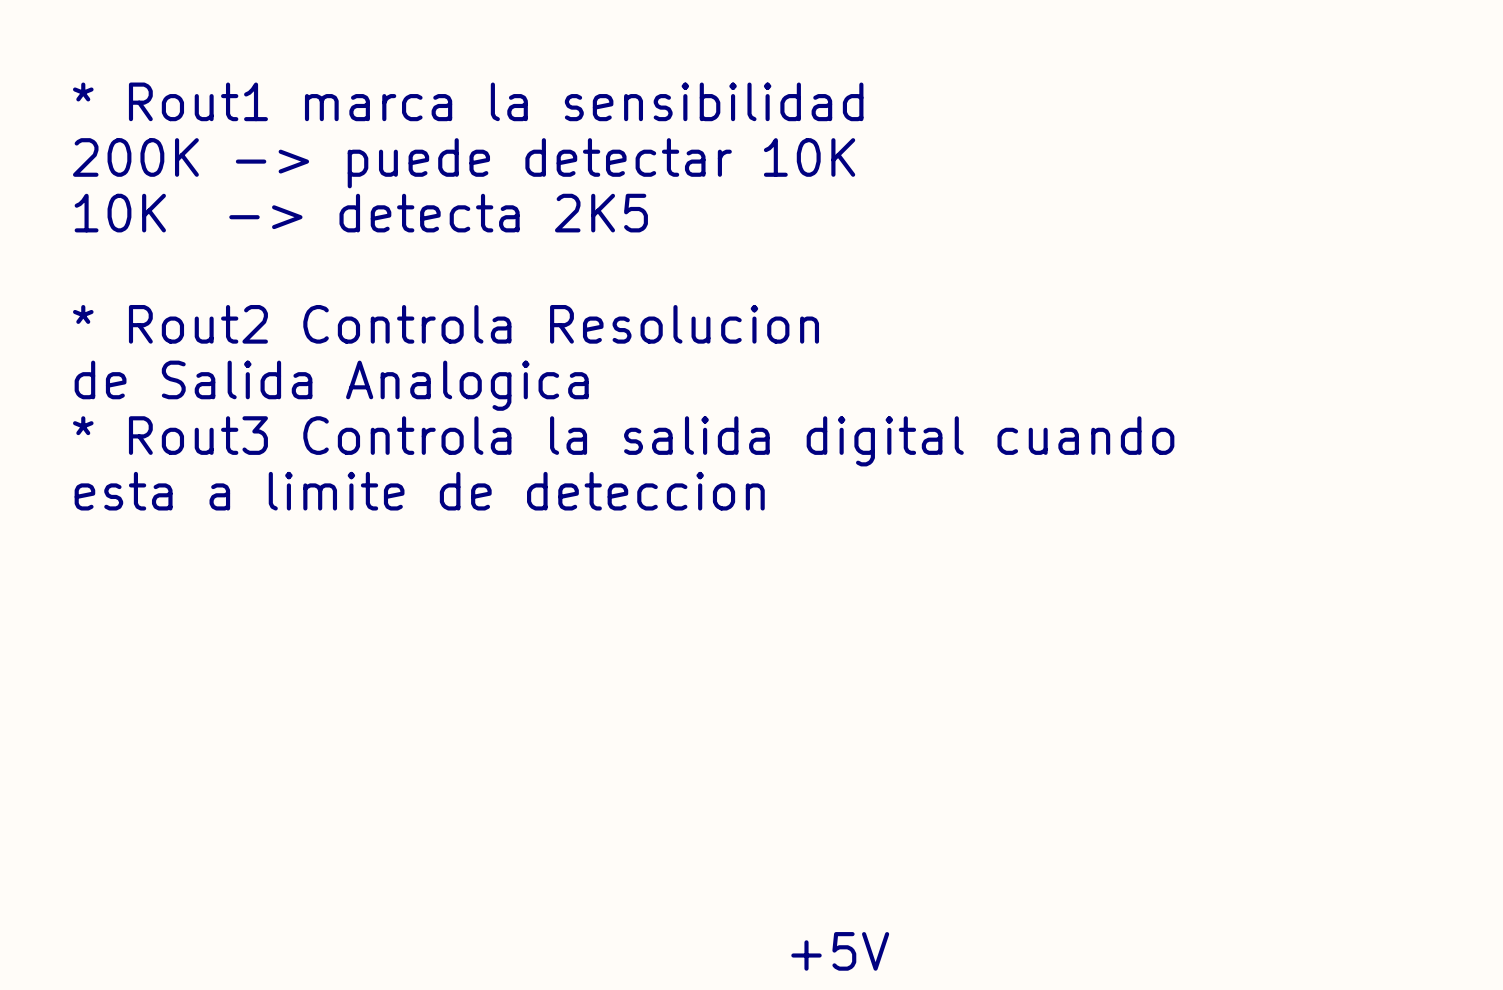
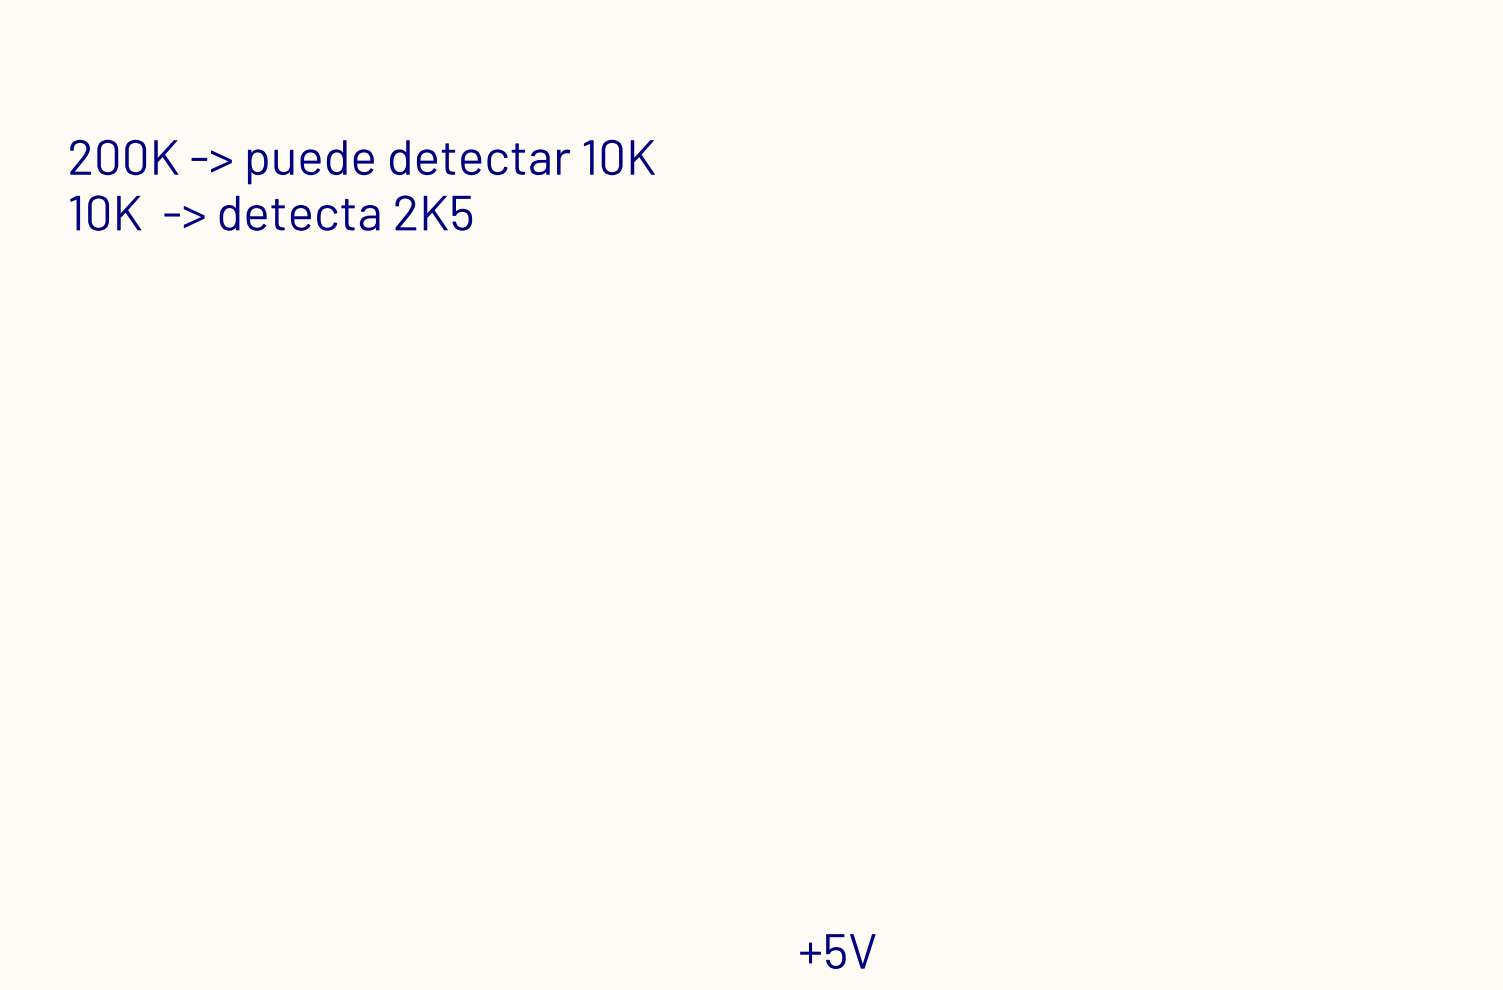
text: * Rout1 marca la sensibilidad (468, 101) -> none
text: * Rout2 Controla Resolucion (446, 324) -> none
text: de Salida Analogica (331, 385) -> none
text: * Rout3 Controla la salida digital cuando (623, 441) -> none
text: esta a limite de deteccion (419, 491) -> none

